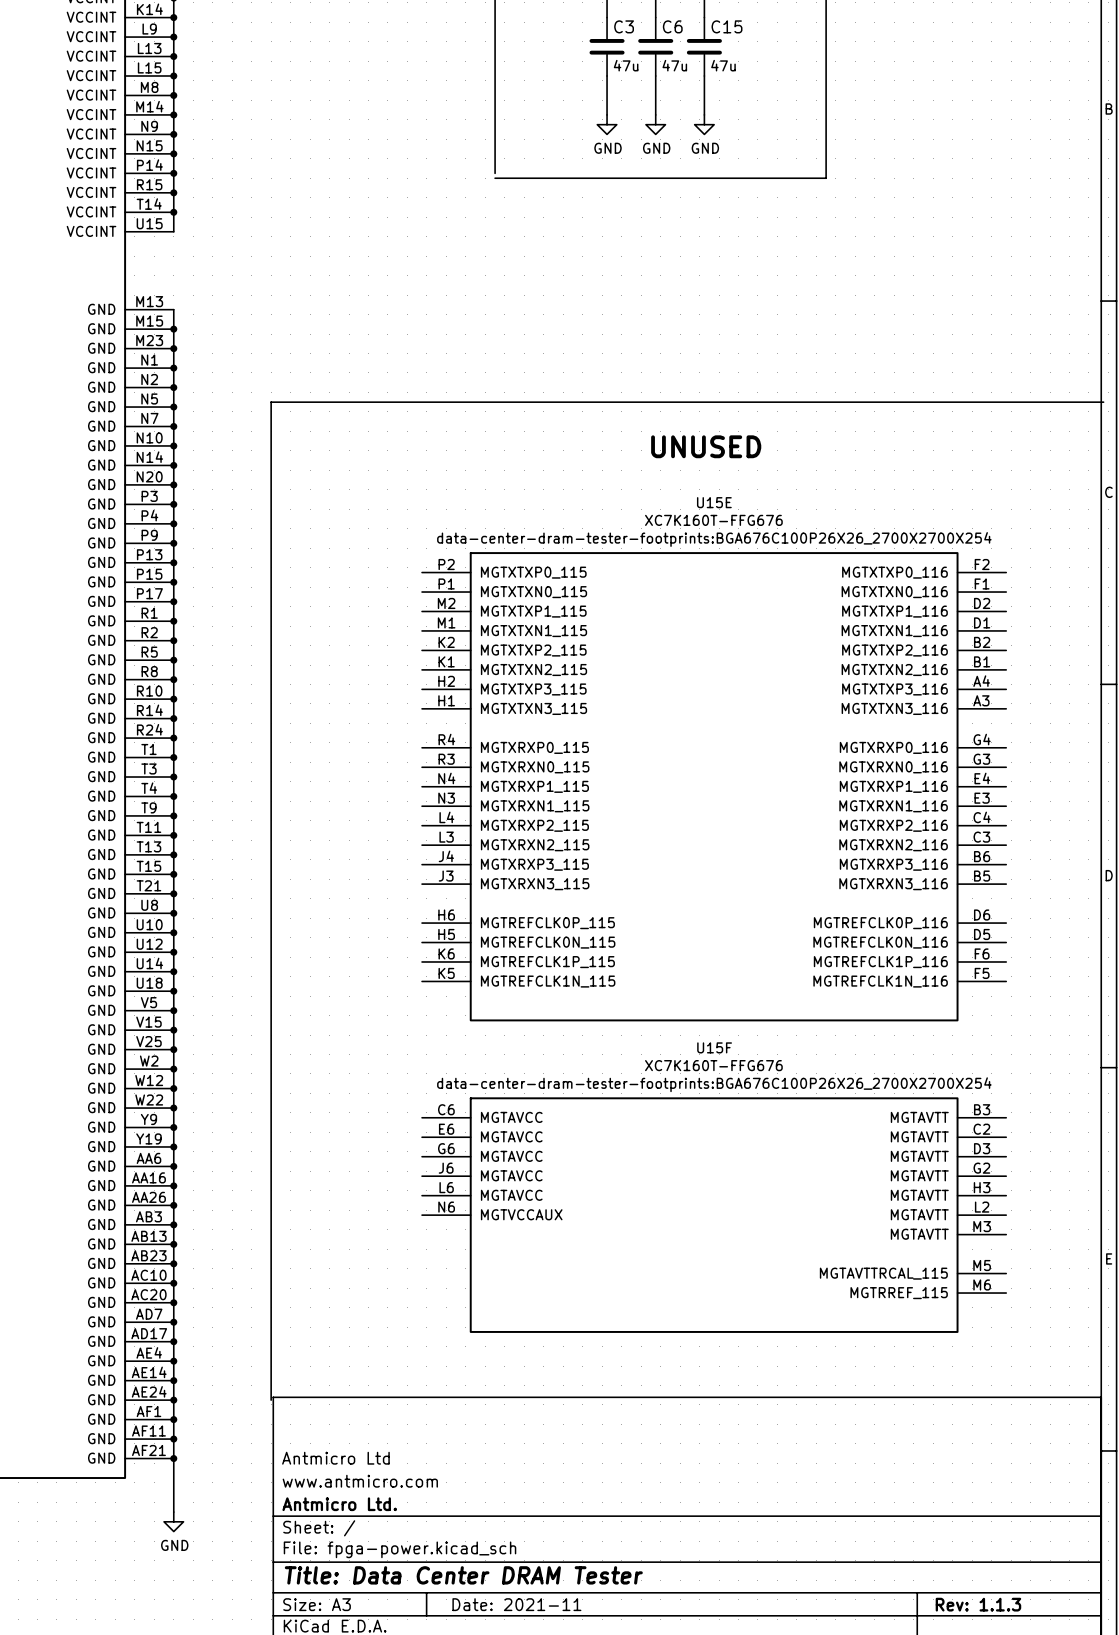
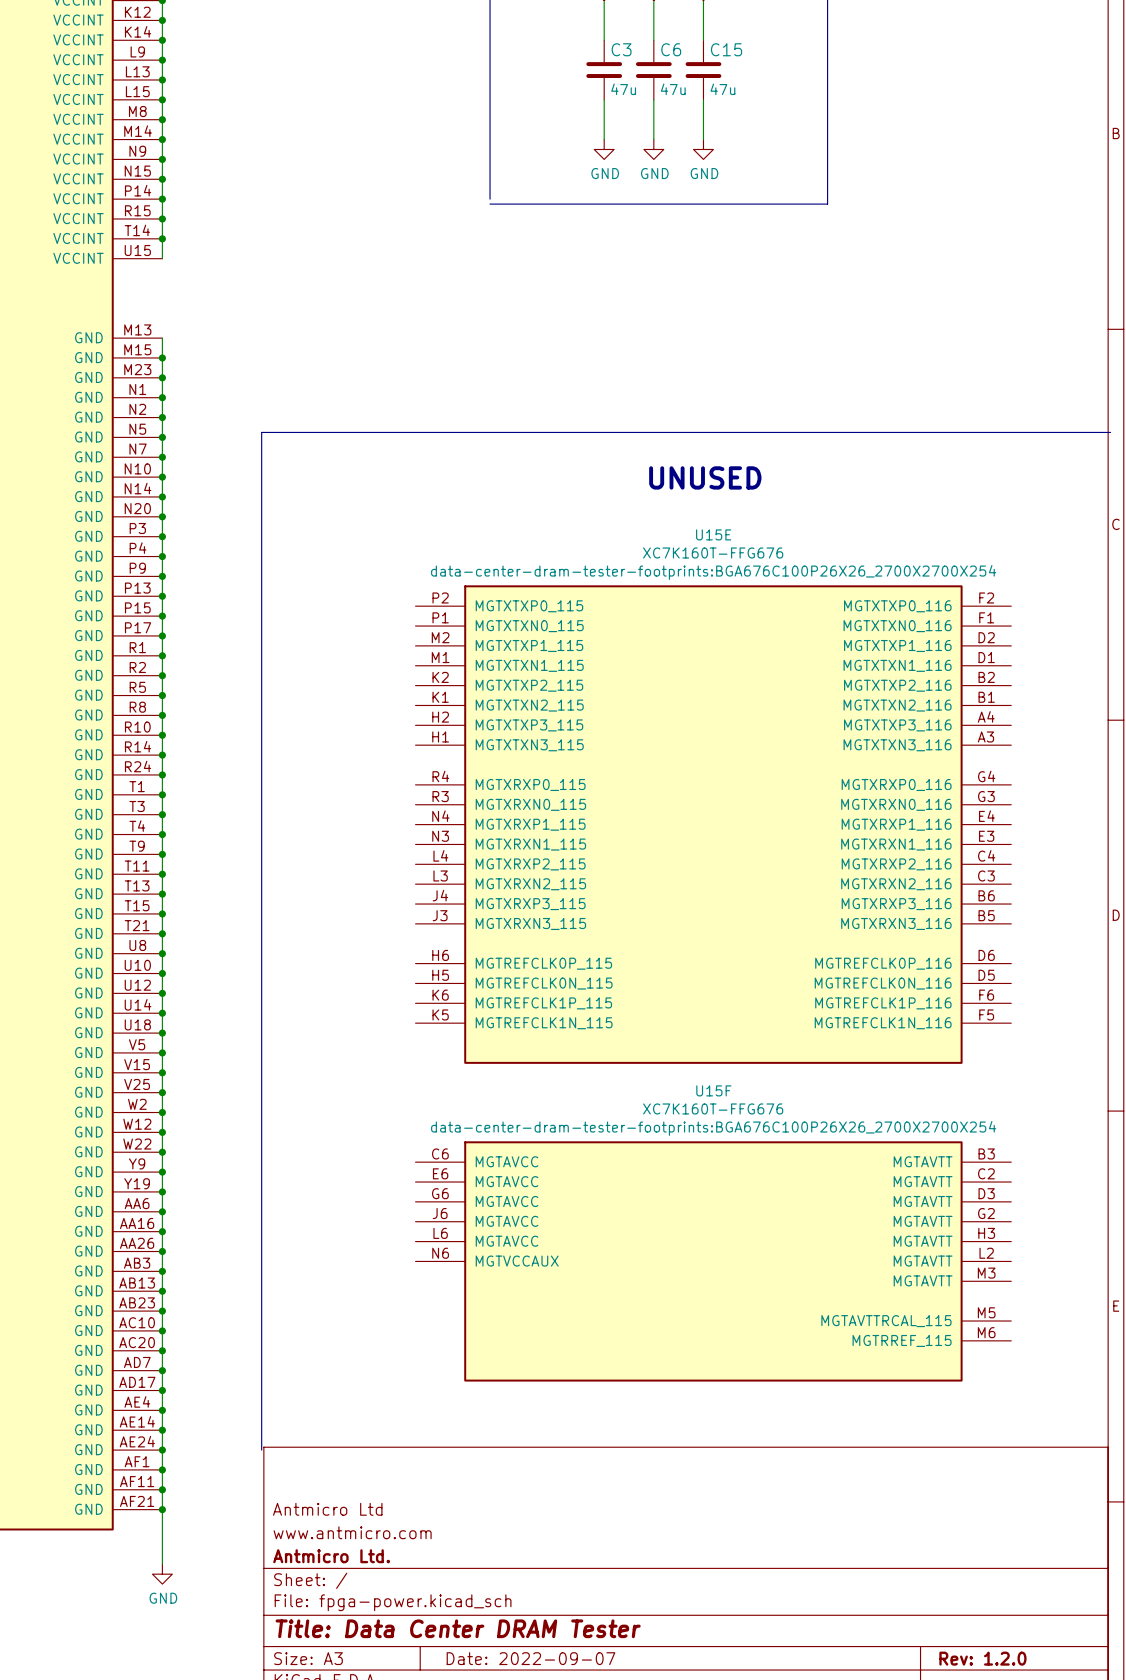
title block: Date: 2021-11 (516, 1604) -> Date: 2022-09-07 (531, 1658)
title block: Rev: 1.1.3 (978, 1604) -> Rev: 1.2.0 (982, 1658)

